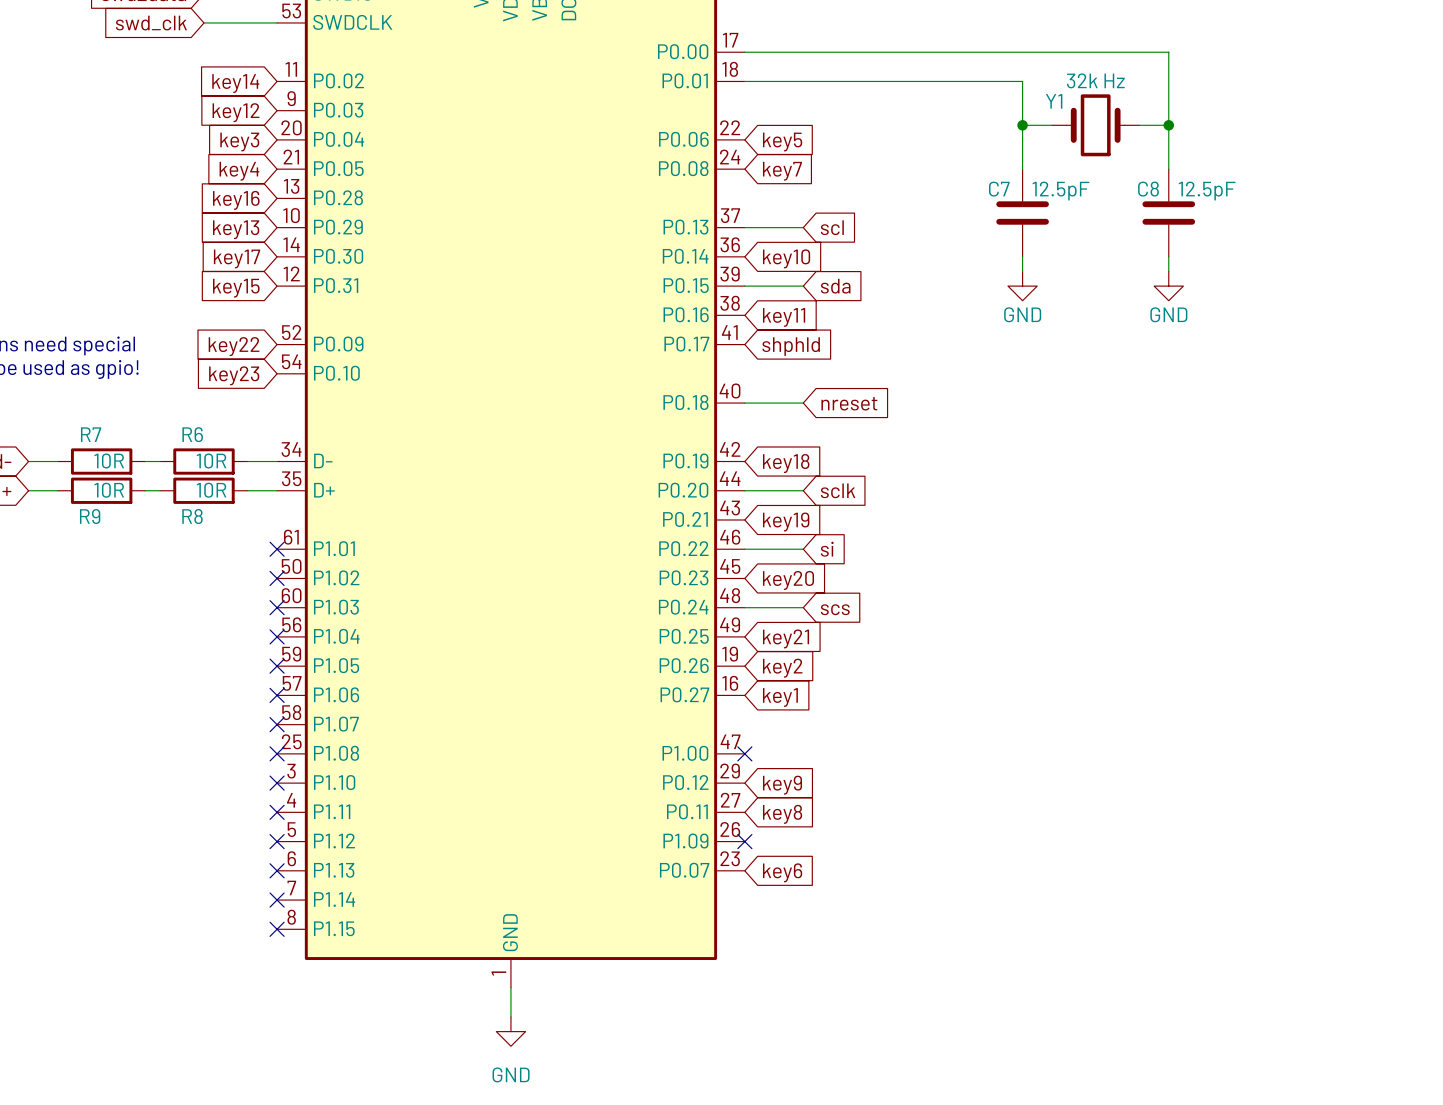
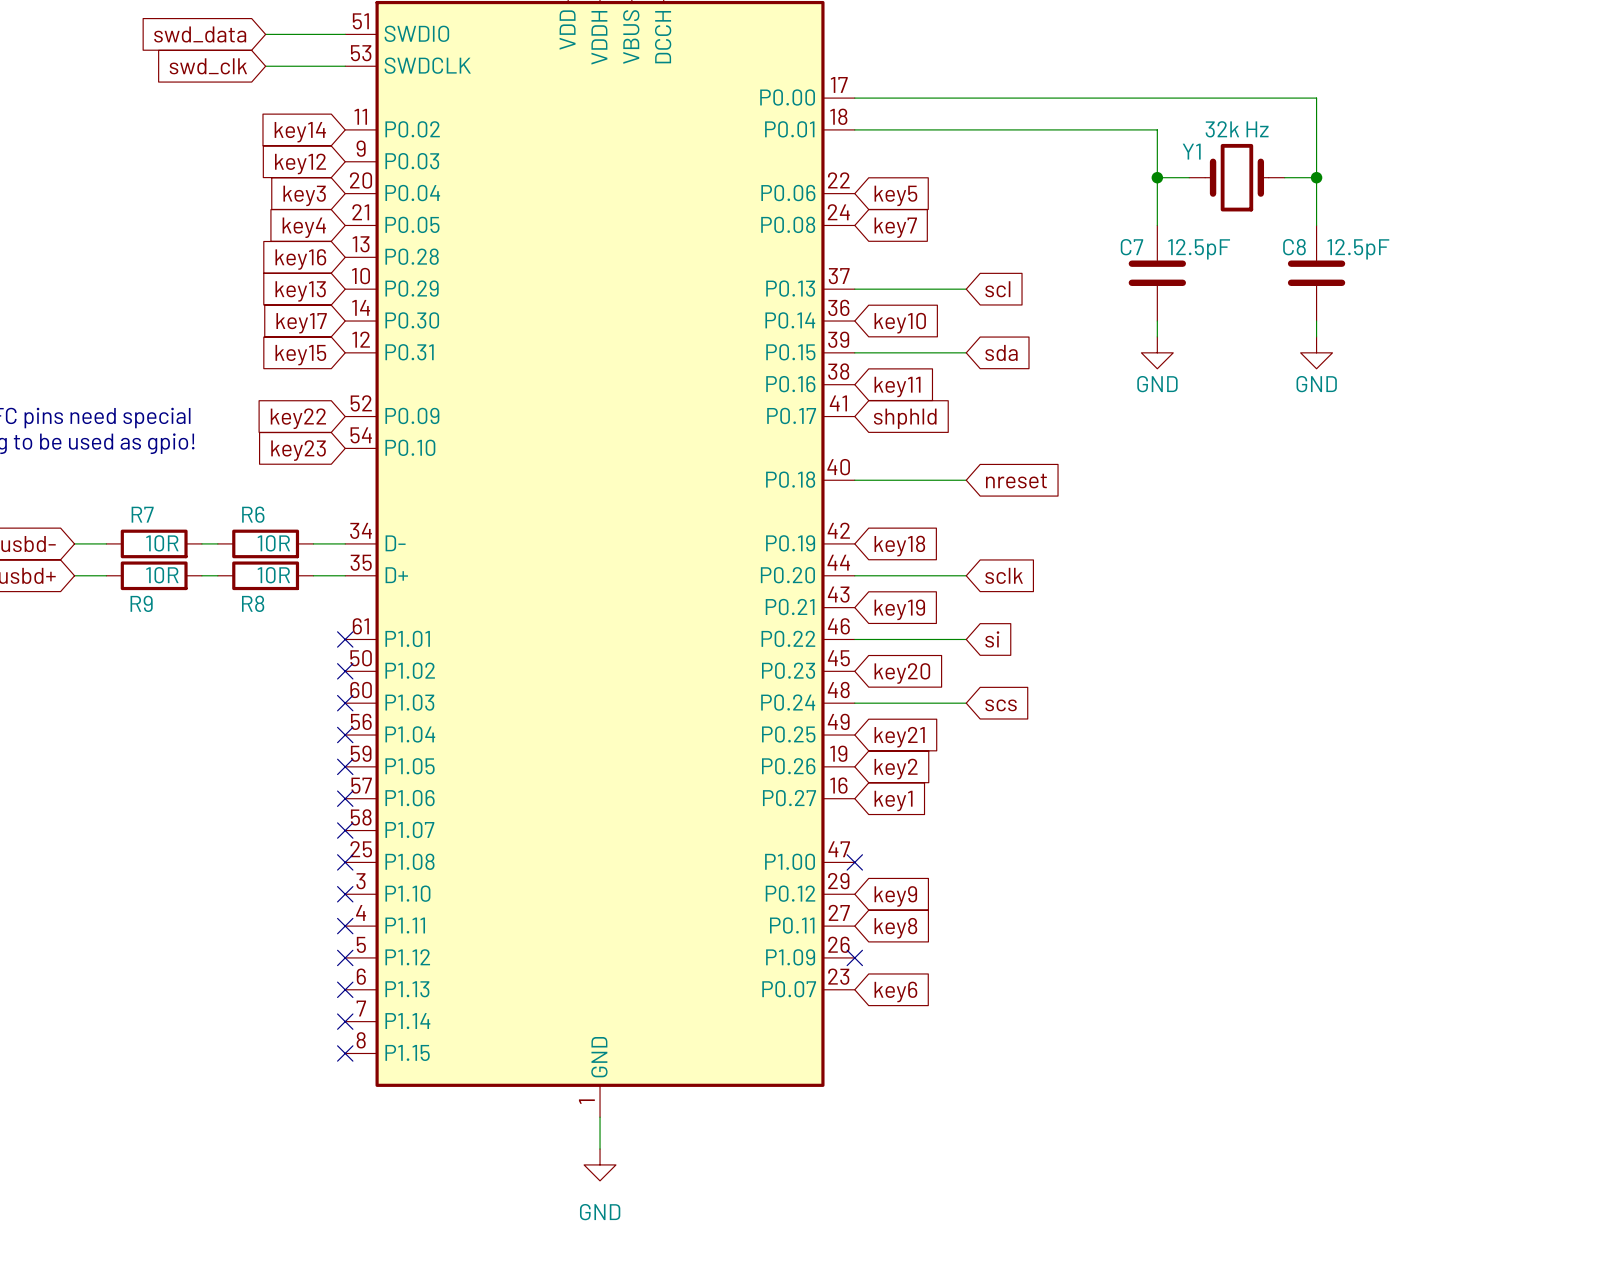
wire: none -> (918, 289) (966, 289)
global label position: scl (832, 227) -> scl (997, 289)
wire: none -> (918, 352) (966, 352)
global label position: sda (835, 286) -> sda (1001, 352)
wire: none -> (918, 480) (966, 480)
global label position: nreset (849, 403) -> nreset (1016, 481)
wire: none -> (918, 575) (966, 575)
global label position: sclk (838, 490) -> sclk (1004, 575)
wire: none -> (918, 639) (966, 639)
global label position: si (827, 549) -> si (992, 639)
wire: none -> (918, 703) (966, 703)
global label position: scs (835, 609) -> scs (1001, 705)

